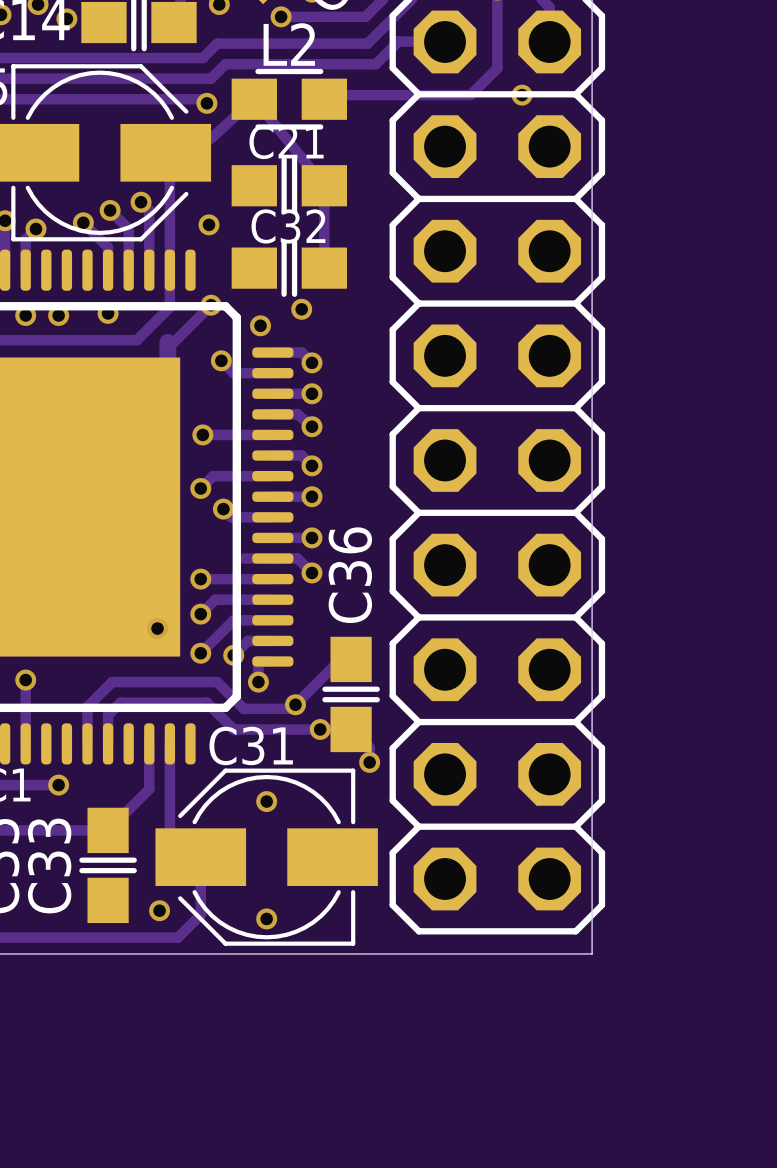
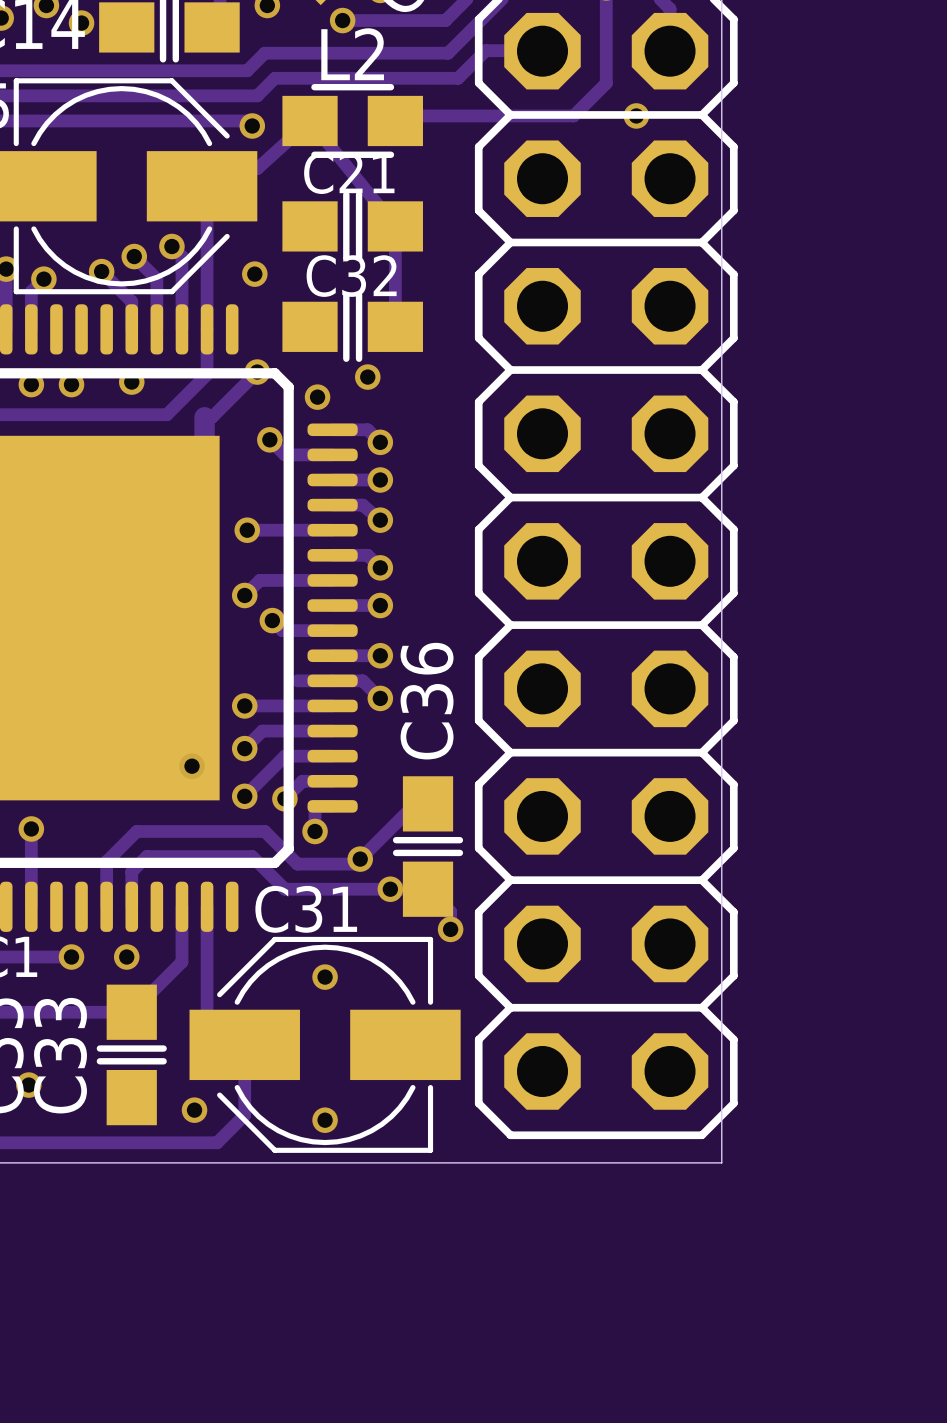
via: none -> (126, 957)
via: none -> (28, 1085)

